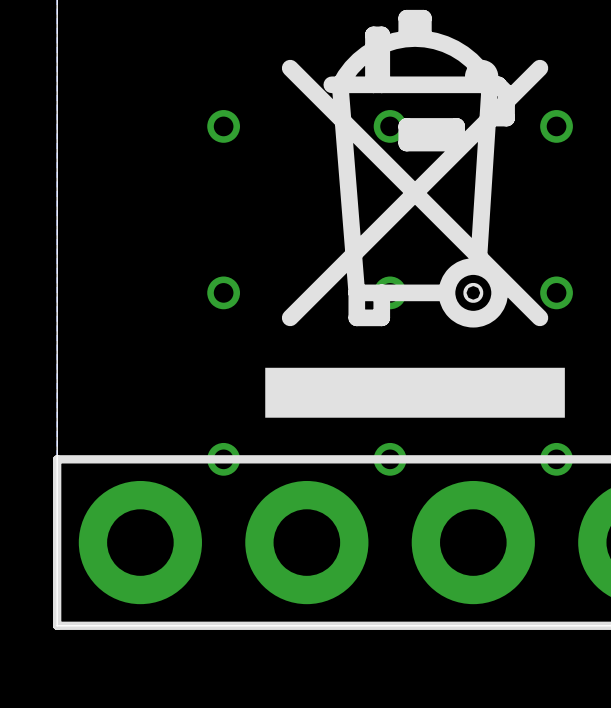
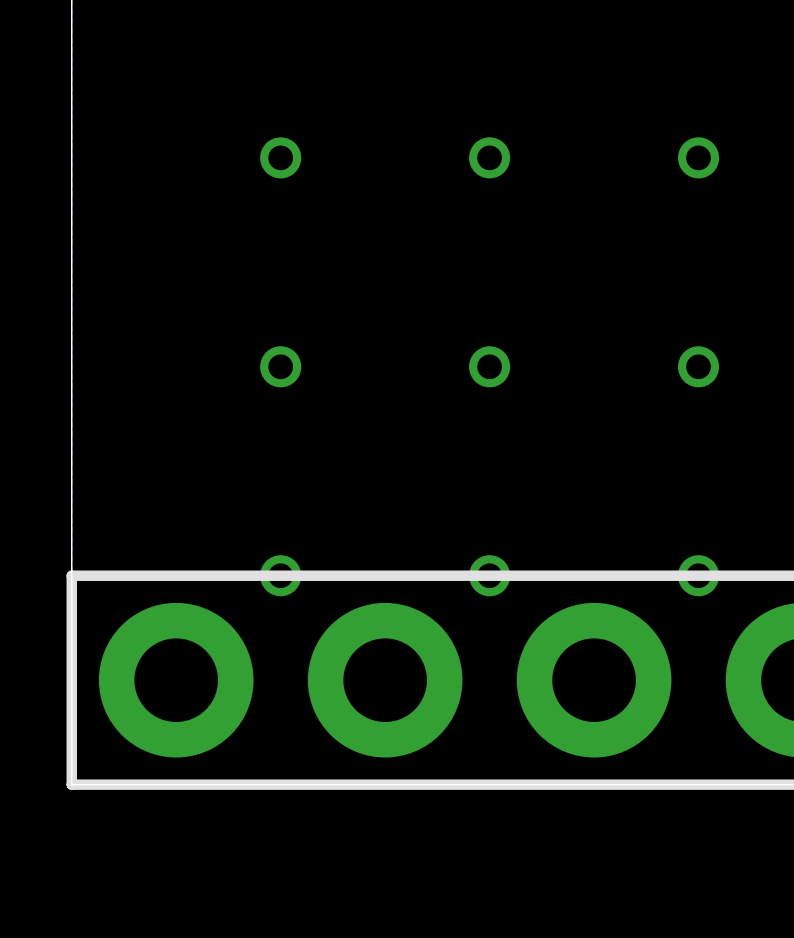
drawing: [265, 9, 565, 418] -> none

